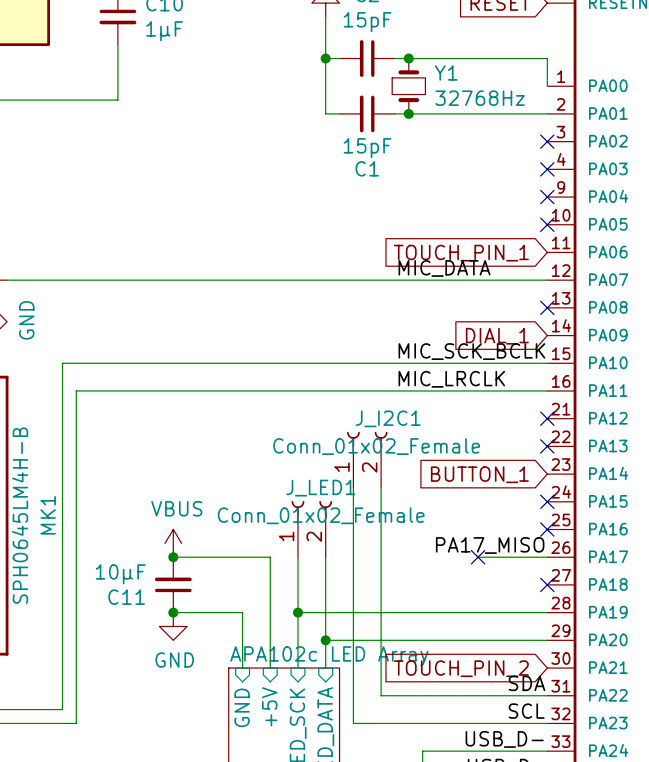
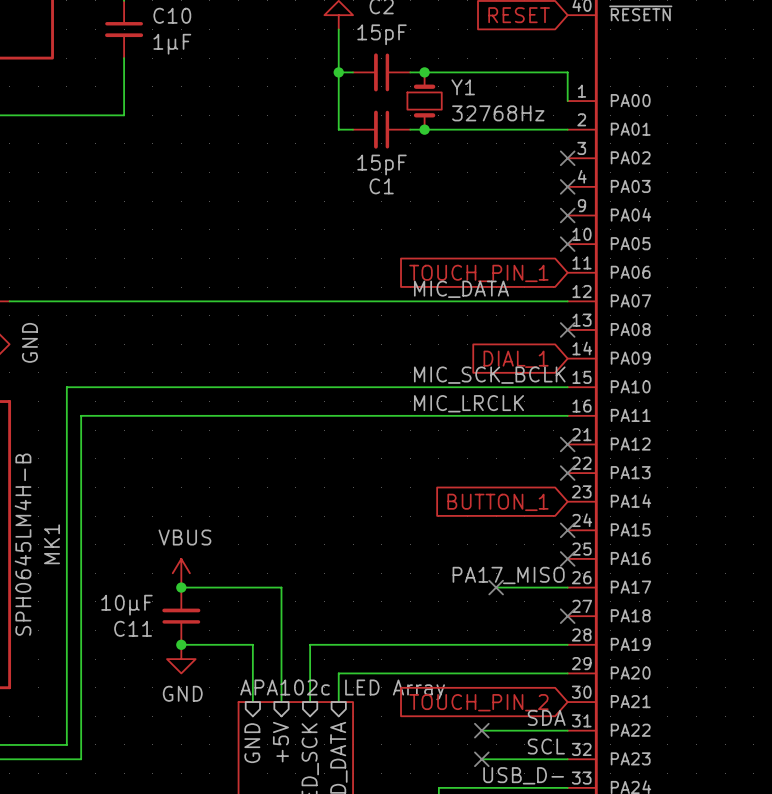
J_I2C1: Conn_01x02_Female (367, 459) -> none
wire: (353, 487) (353, 723) (464, 723) -> none
wire: (381, 487) (381, 695) (464, 695) -> none
J_LED1: Conn_01x02_Female (311, 529) -> none
wire: (297, 557) (297, 612) -> none
wire: (325, 557) (325, 640) -> none
junction: (297, 612) -> none
junction: (325, 640) -> none
no-connect mark: none -> (481, 730)
no-connect mark: none -> (481, 759)

